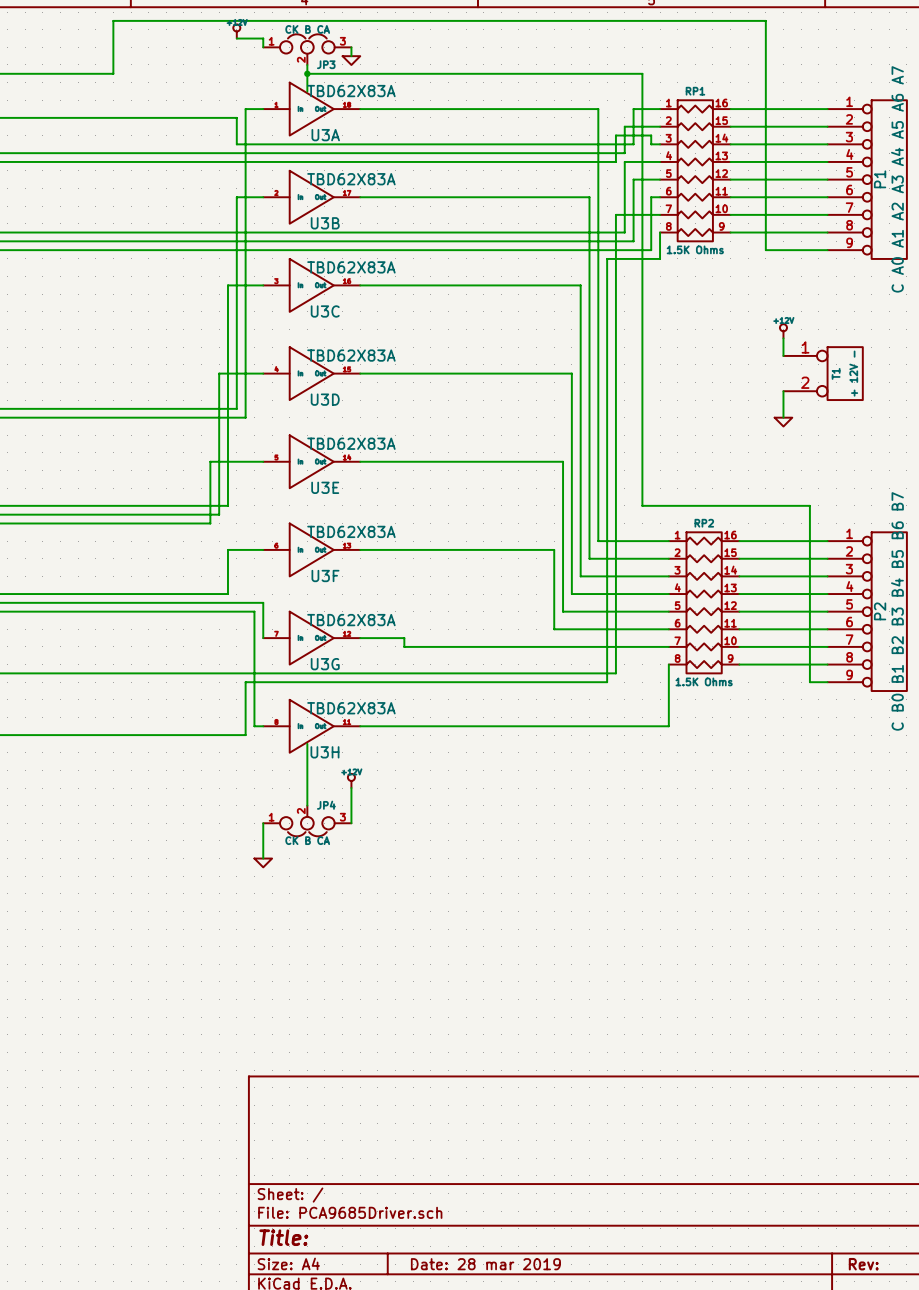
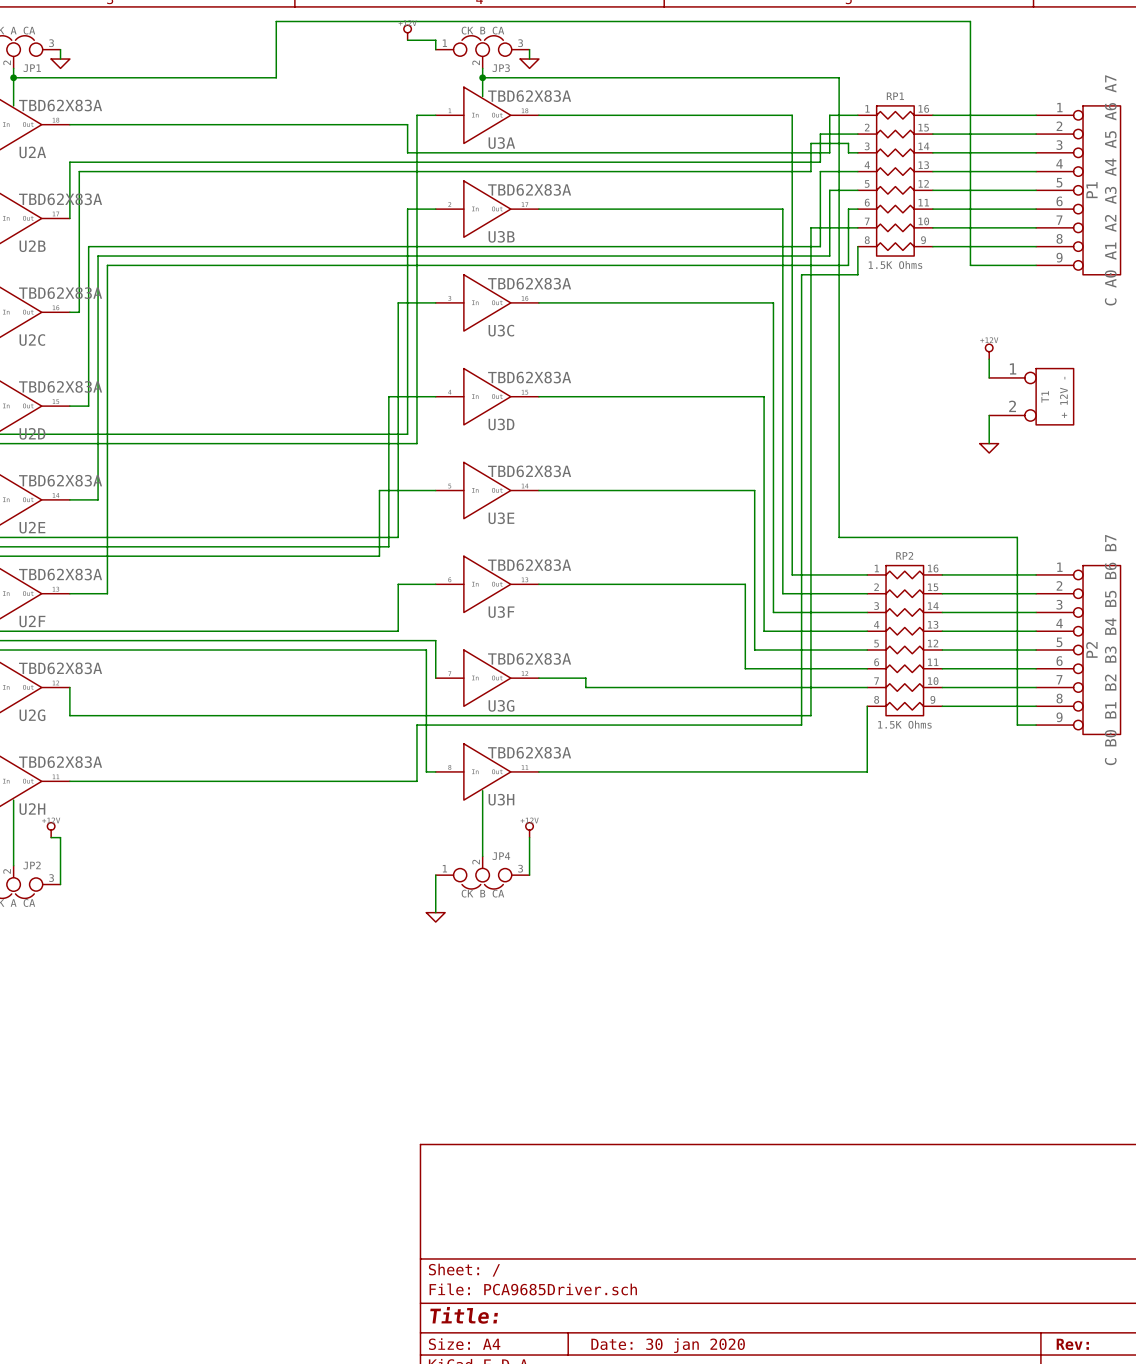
title block: Date: 28 mar 2019 (485, 1264) -> Date: 30 jan 2020 (668, 1345)

